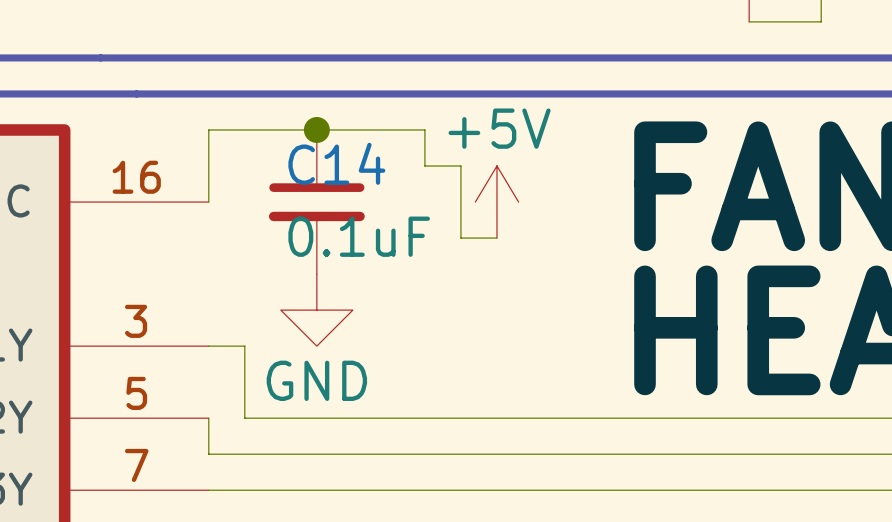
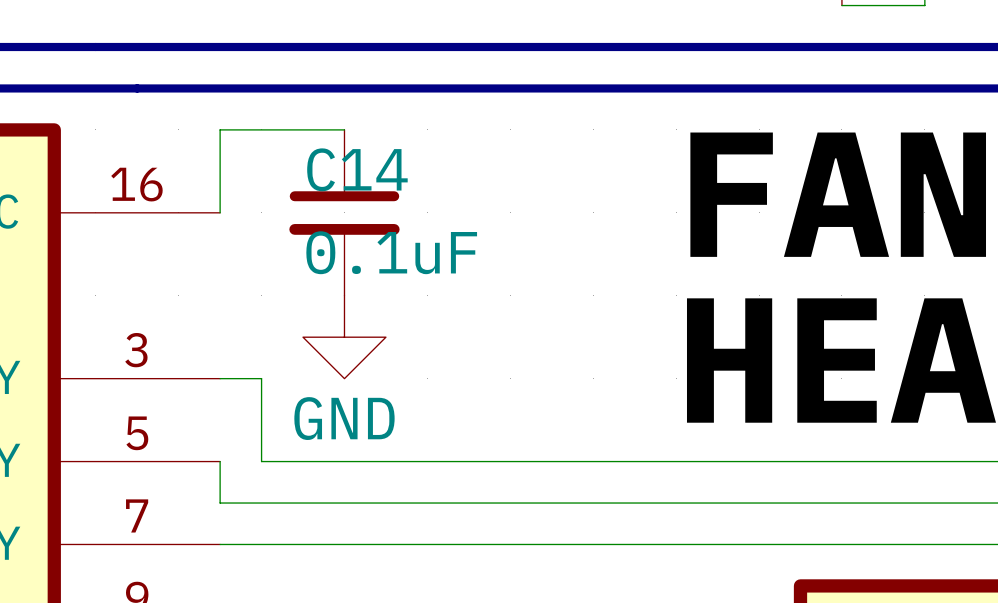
wire: (316, 129) (424, 129) (424, 166) (460, 166) (460, 238) (496, 238) -> none
junction: (316, 129) -> none
power symbol: +5V (496, 202) -> none

